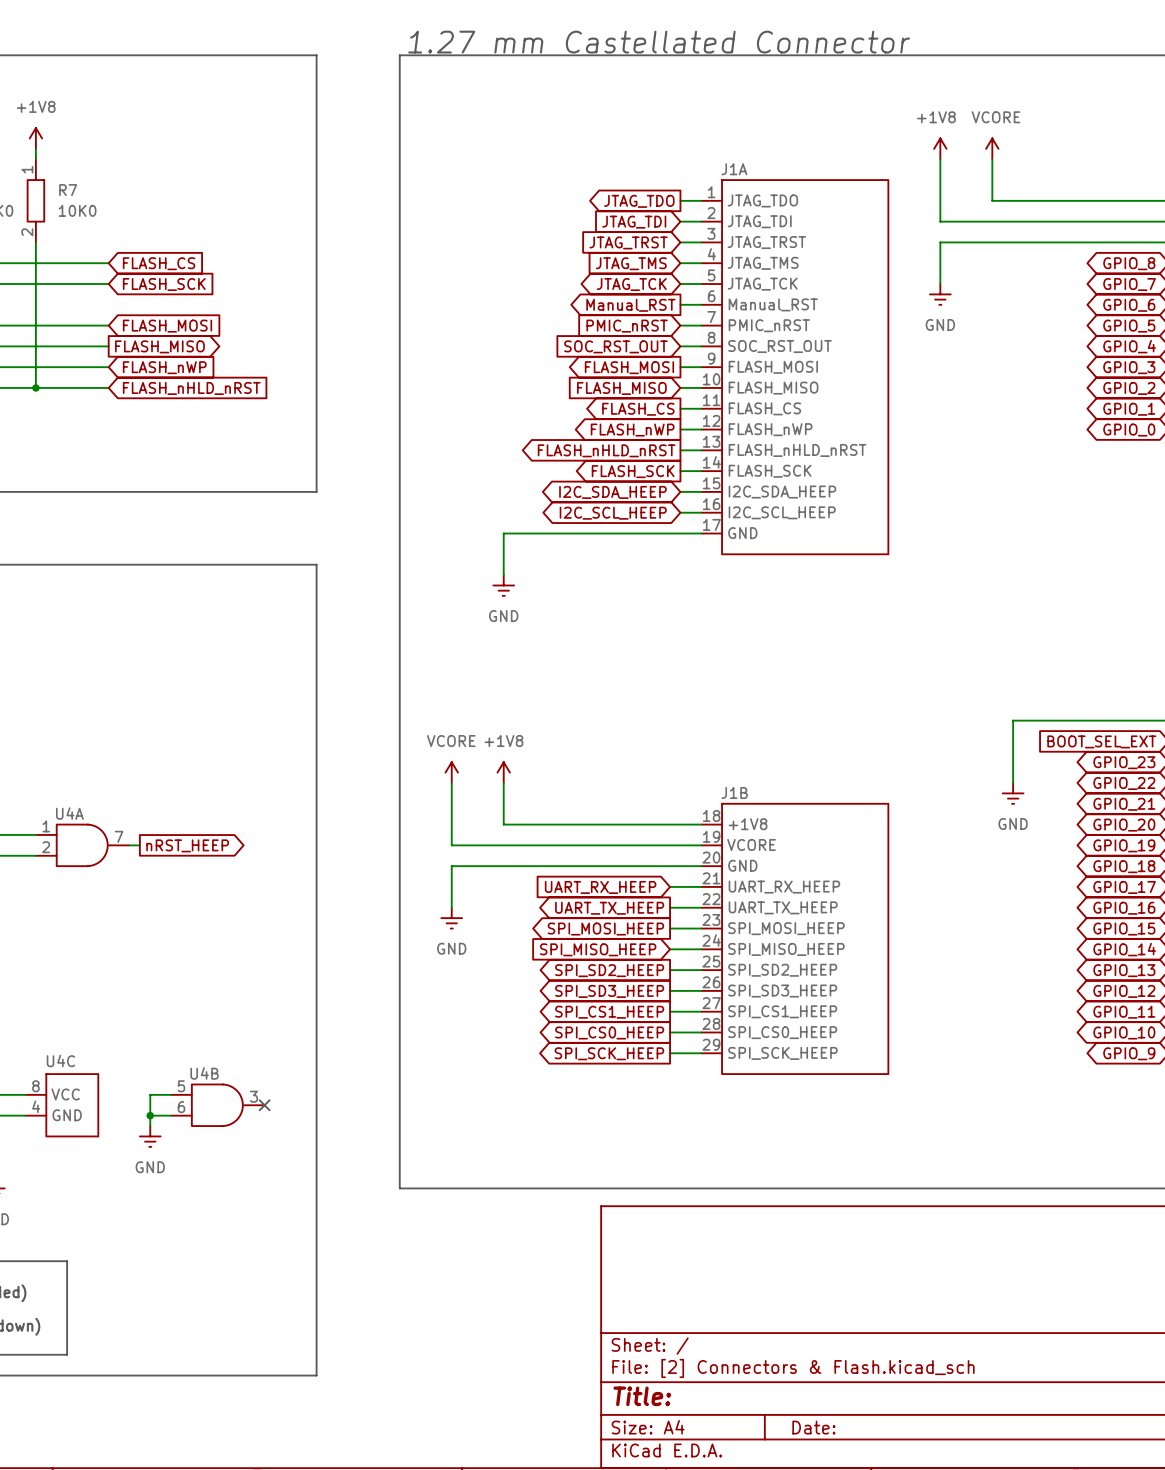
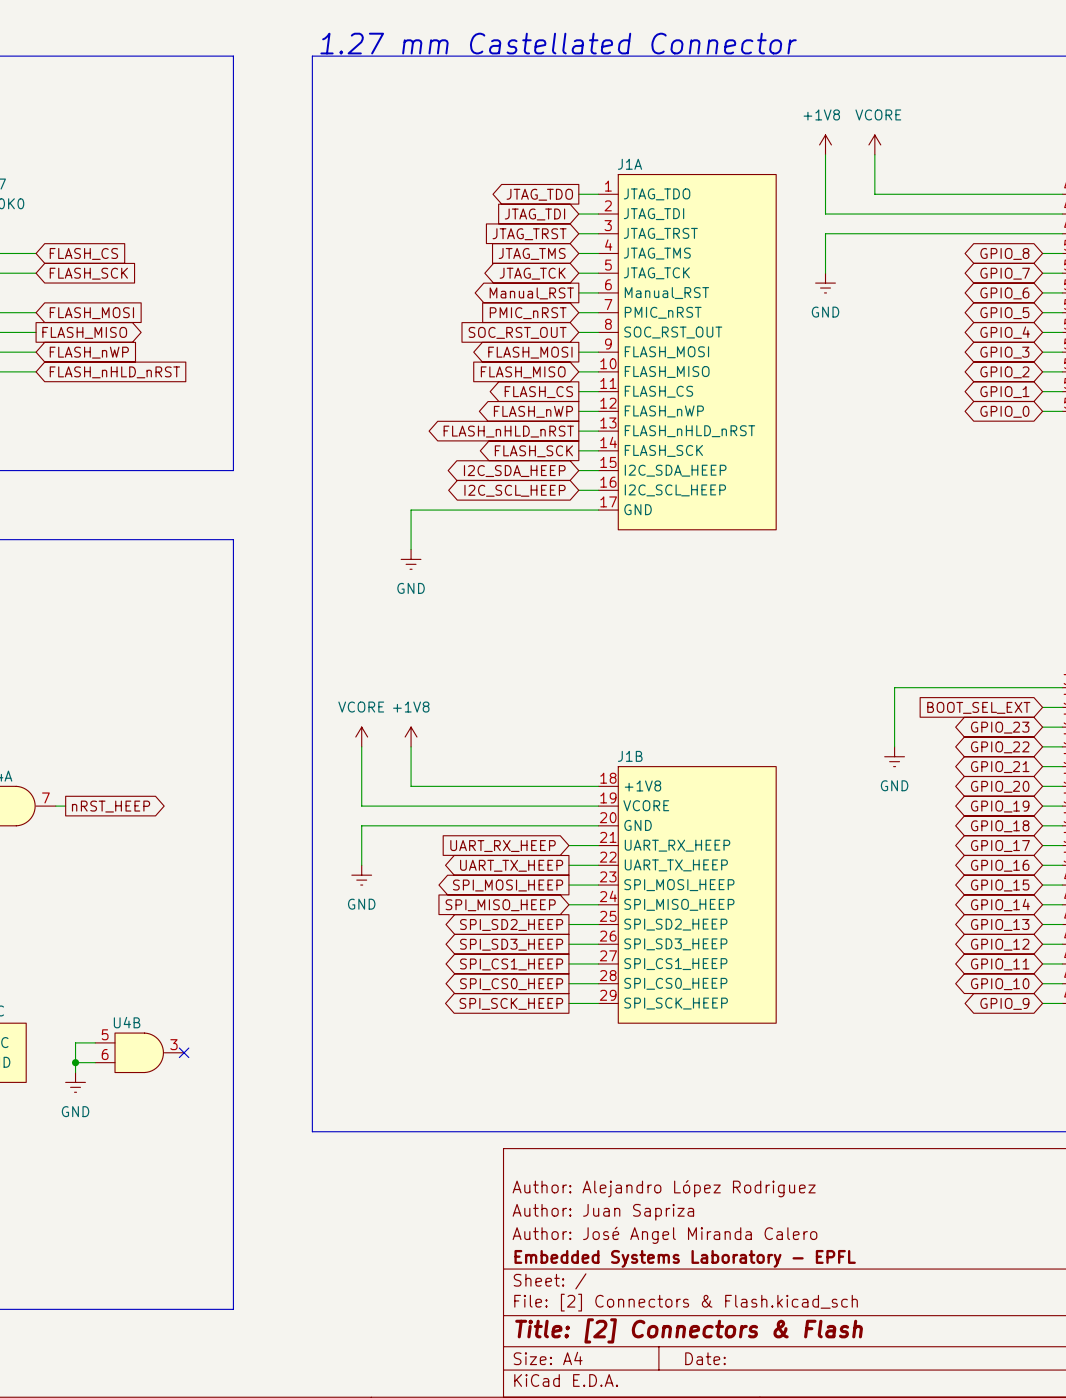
title block: none -> Author: Alejandro López Rodriguez (664, 1188)
title block: none -> Author: Juan Sapriza (603, 1212)
title block: none -> Author: José Angel Miranda Calero (664, 1235)
title block: none -> Embedded Systems Laboratory - EPFL (685, 1258)
title block: Title: (642, 1396) -> Title: [2] Connectors & Flash (689, 1330)

